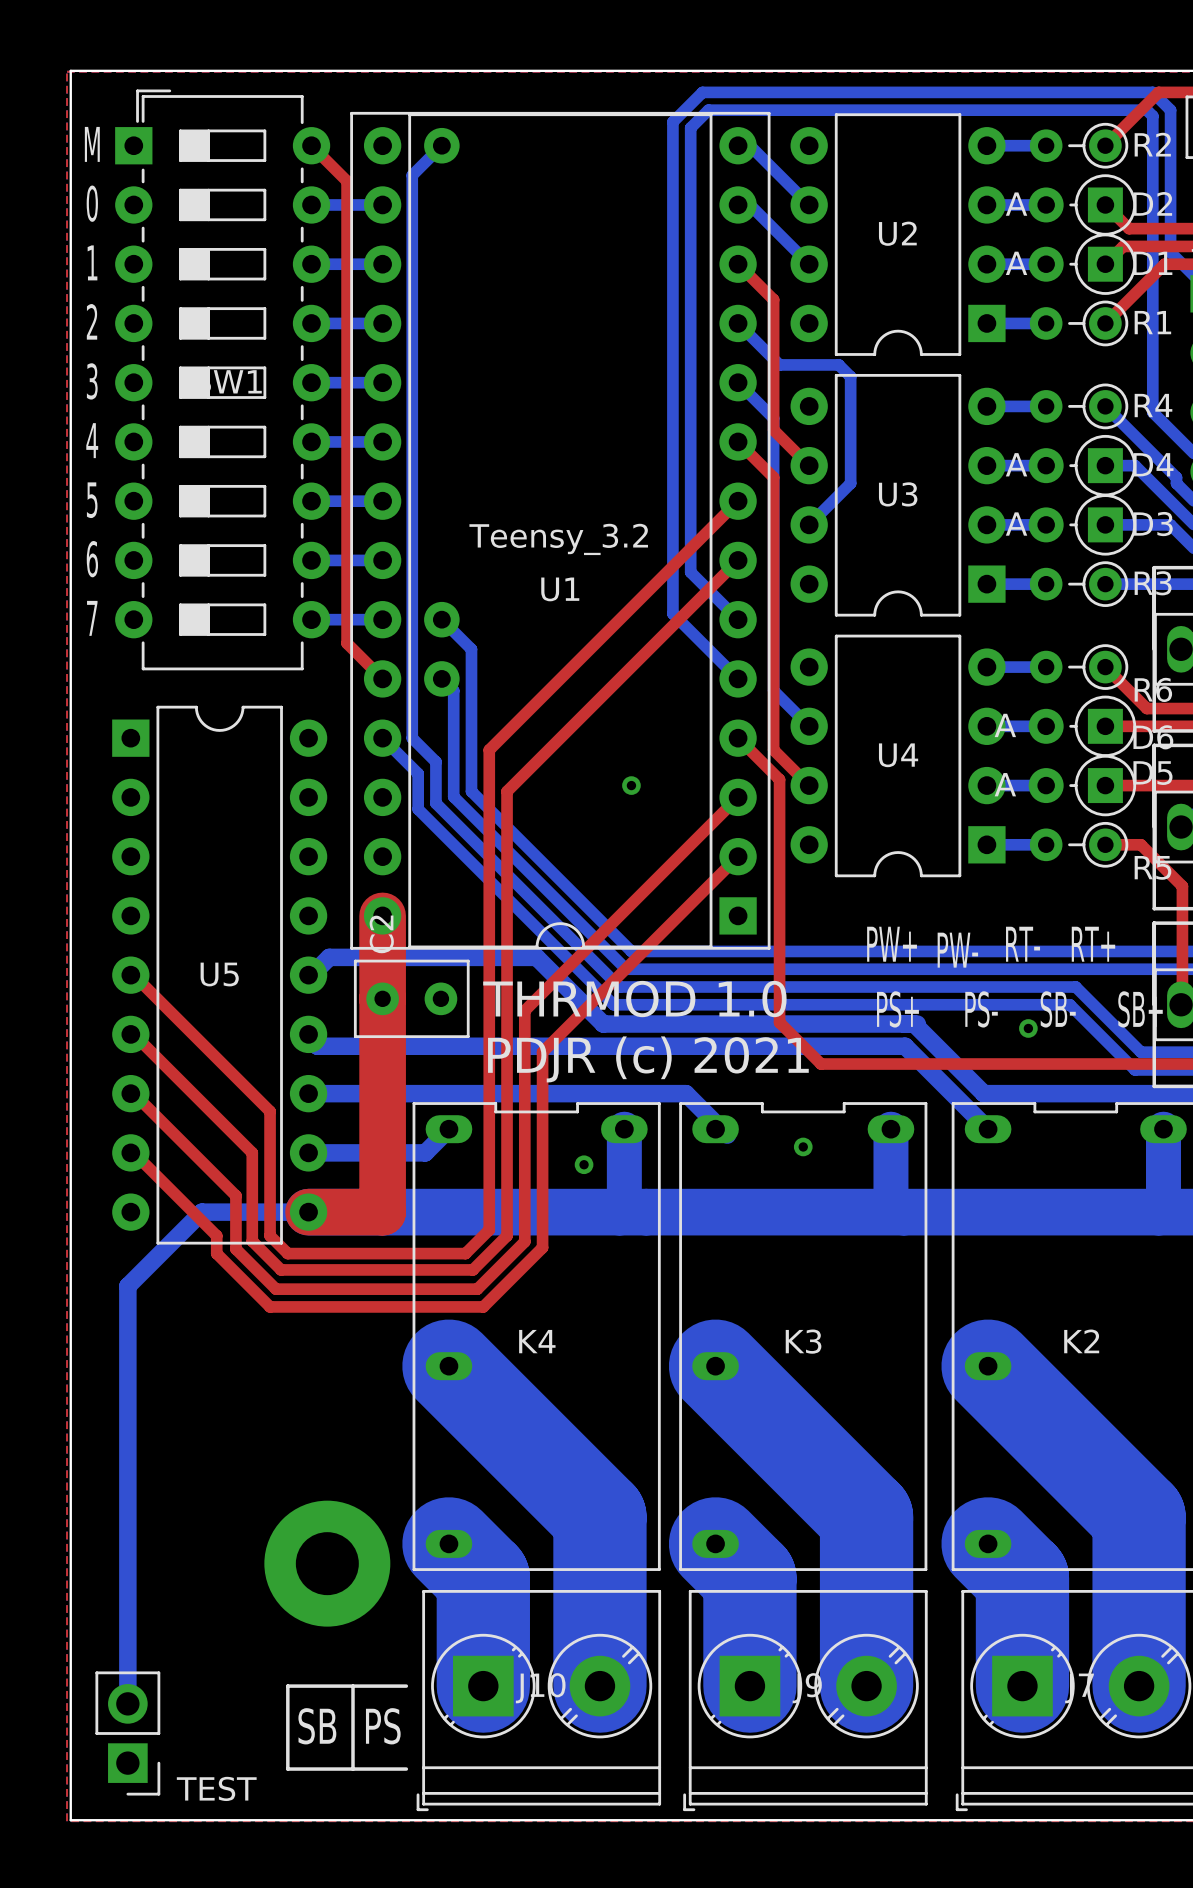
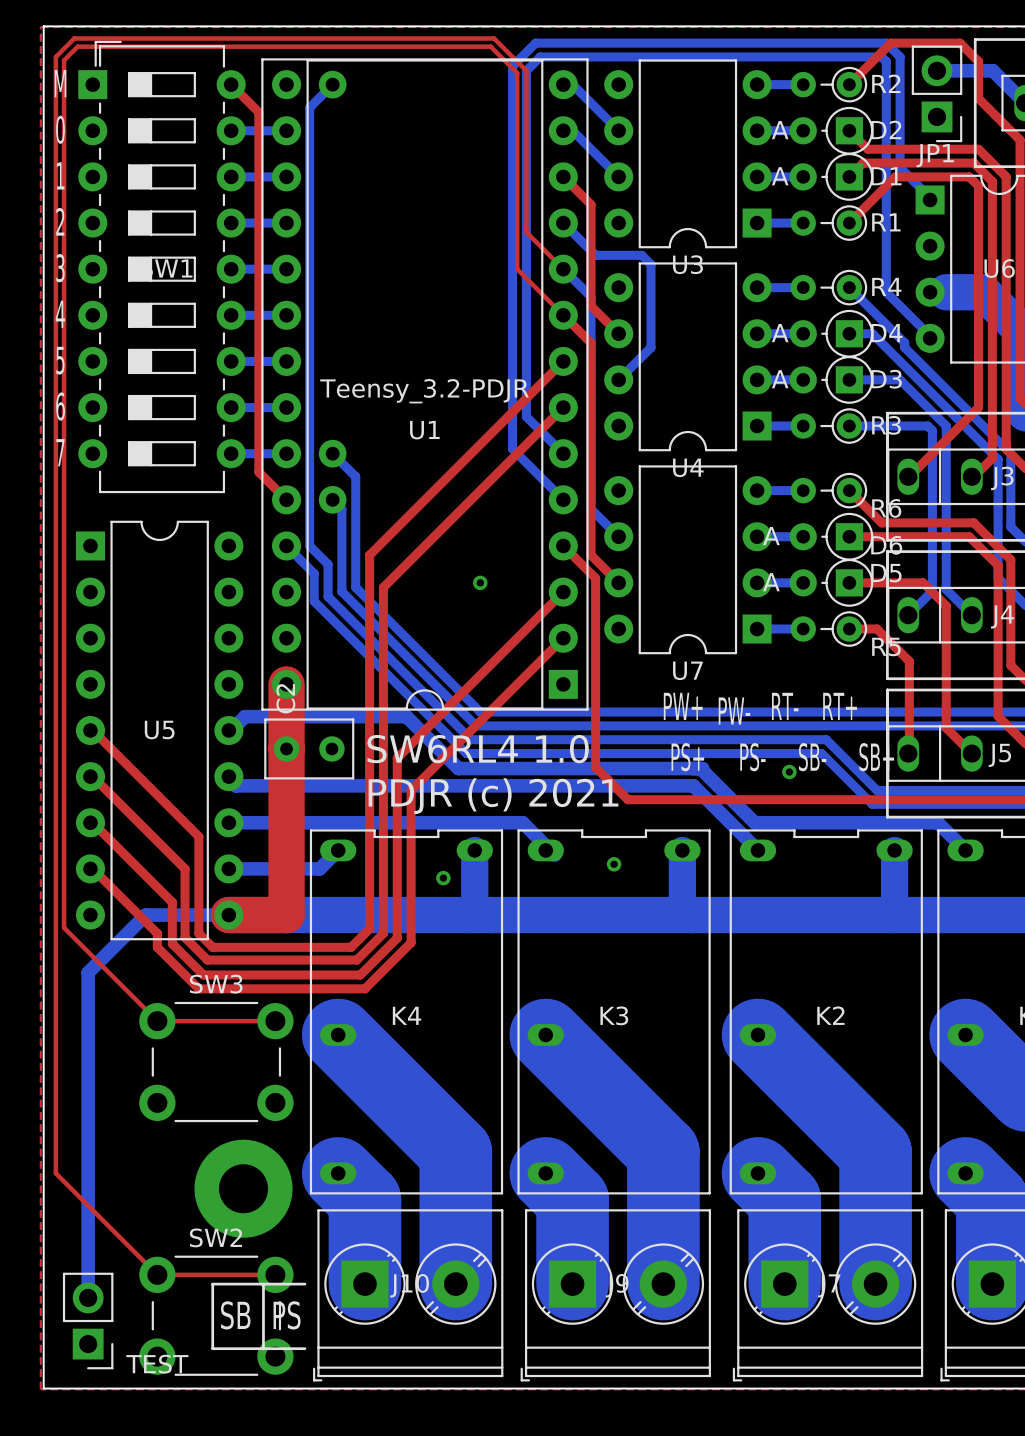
U2 name: U2 (897, 233) -> U3 (687, 264)
top track: none -> (563, 269) (526, 232) (526, 70) (494, 38) (74, 38) (55, 56) (55, 1173) (157, 1274) (275, 1274)
top track: none -> (563, 315) (517, 269) (517, 73) (490, 46) (77, 46) (64, 60) (64, 927) (157, 1021) (275, 1021)
U3 name: U3 (898, 494) -> U4 (688, 467)
U1 value: Teensy_3.2 (558, 539) -> Teensy_3.2-PDJR (424, 391)
U4 name: U4 (898, 755) -> U7 (687, 670)
text: THRMOD 1.0 (634, 999) -> SW6RL4 1.0 (478, 749)
SW3: none -> (216, 1062)
SW2: none -> (216, 1315)

